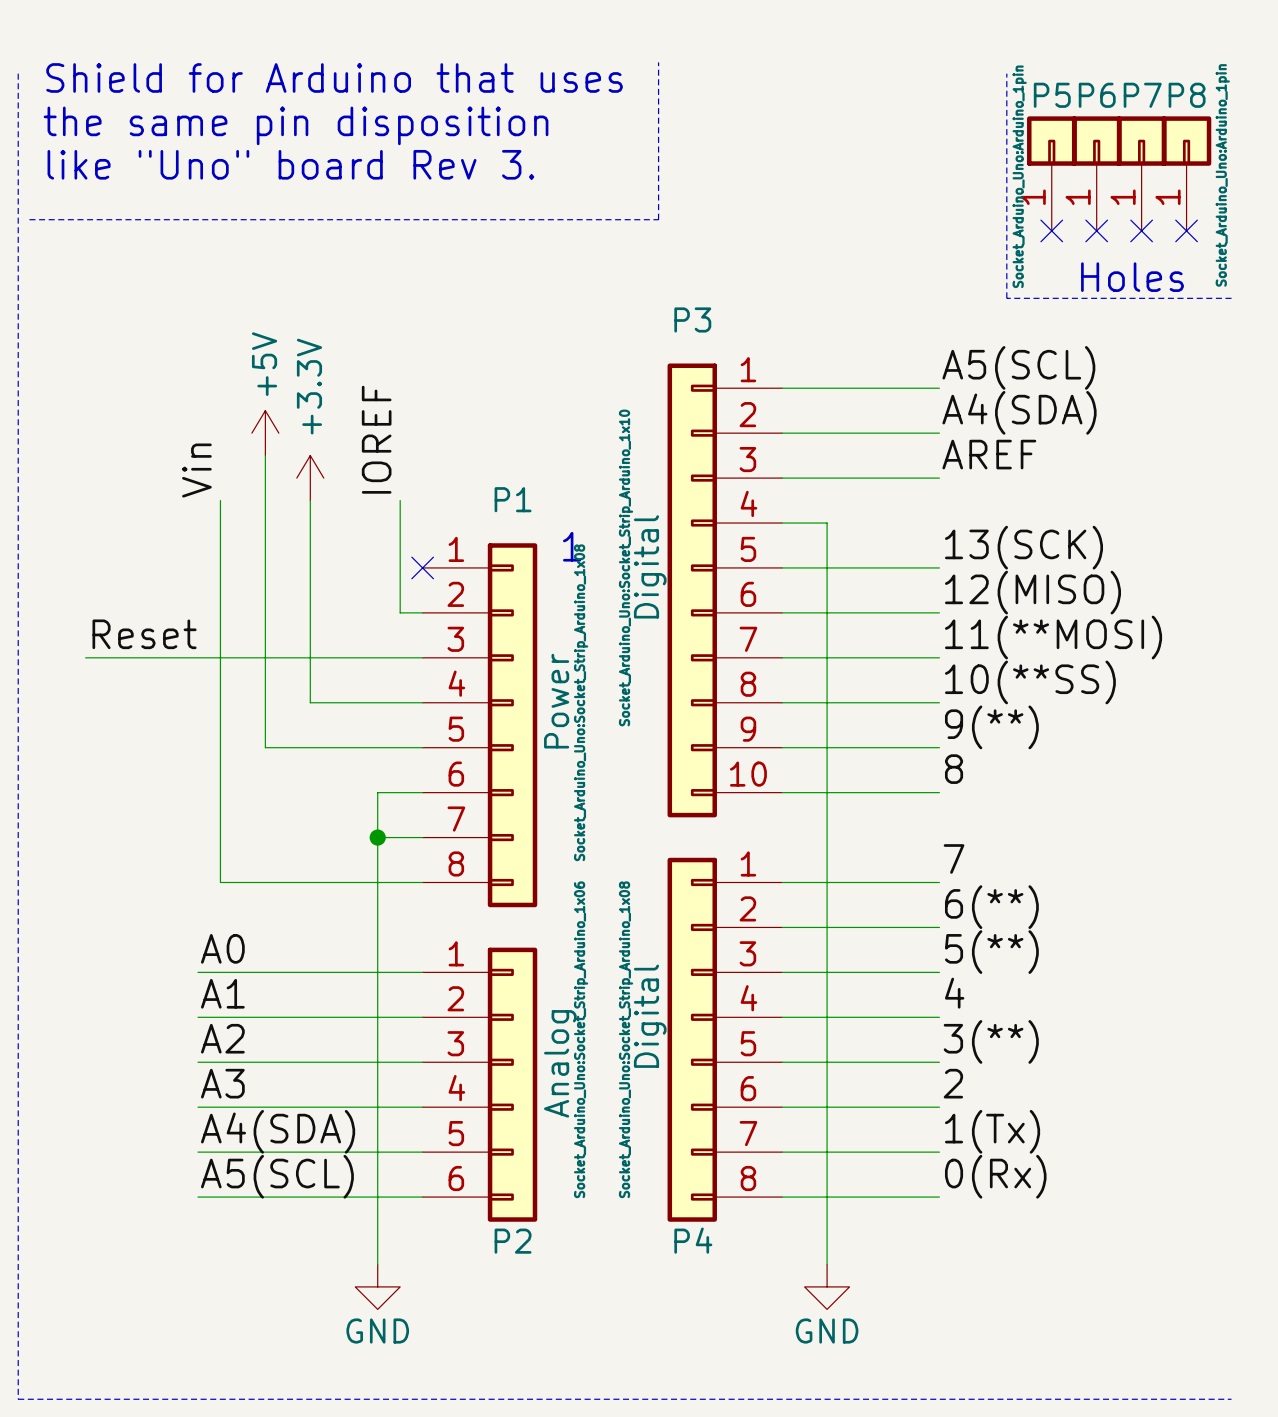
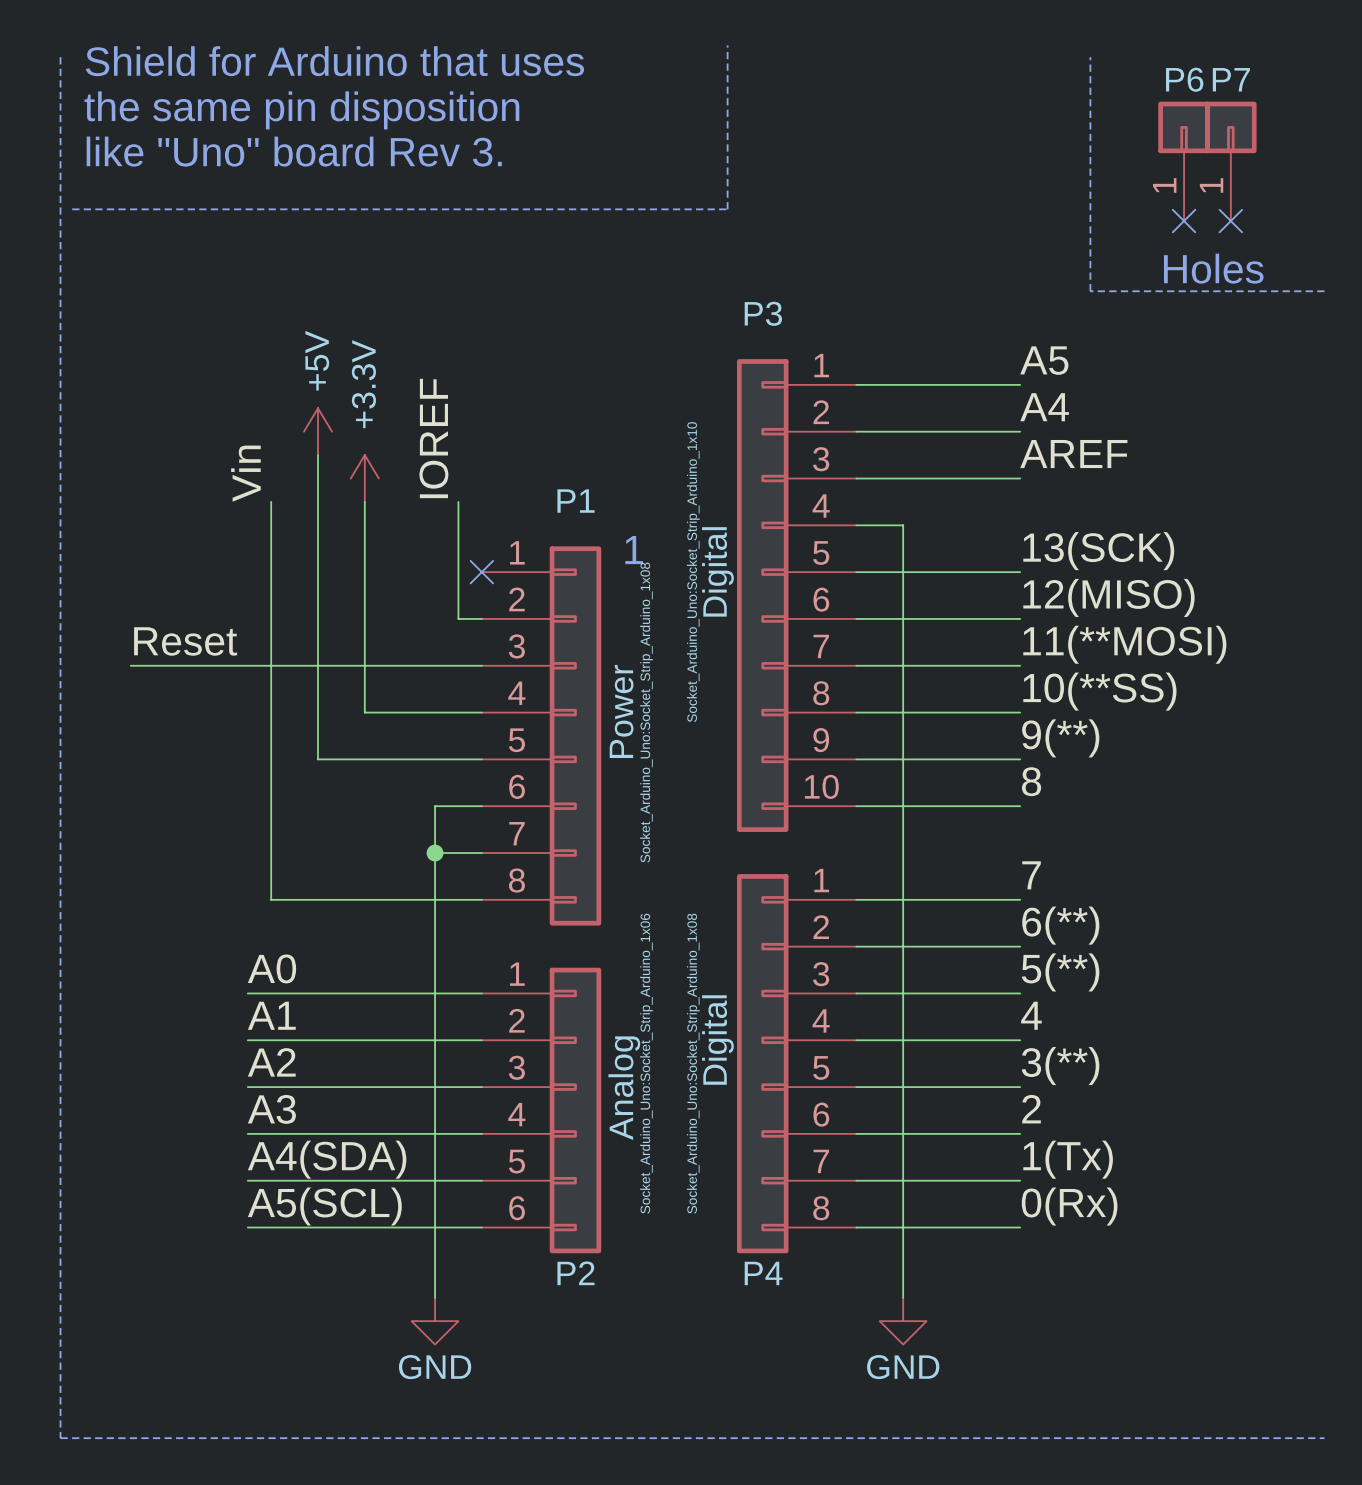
P5: (1051, 173) -> none
P8: (1186, 173) -> none
no-connect mark: (1051, 230) -> none
no-connect mark: (1186, 230) -> none
label: A5(SCL) (1018, 367) -> A5 (1044, 360)
label: A4(SDA) (1019, 412) -> A4 (1044, 407)

